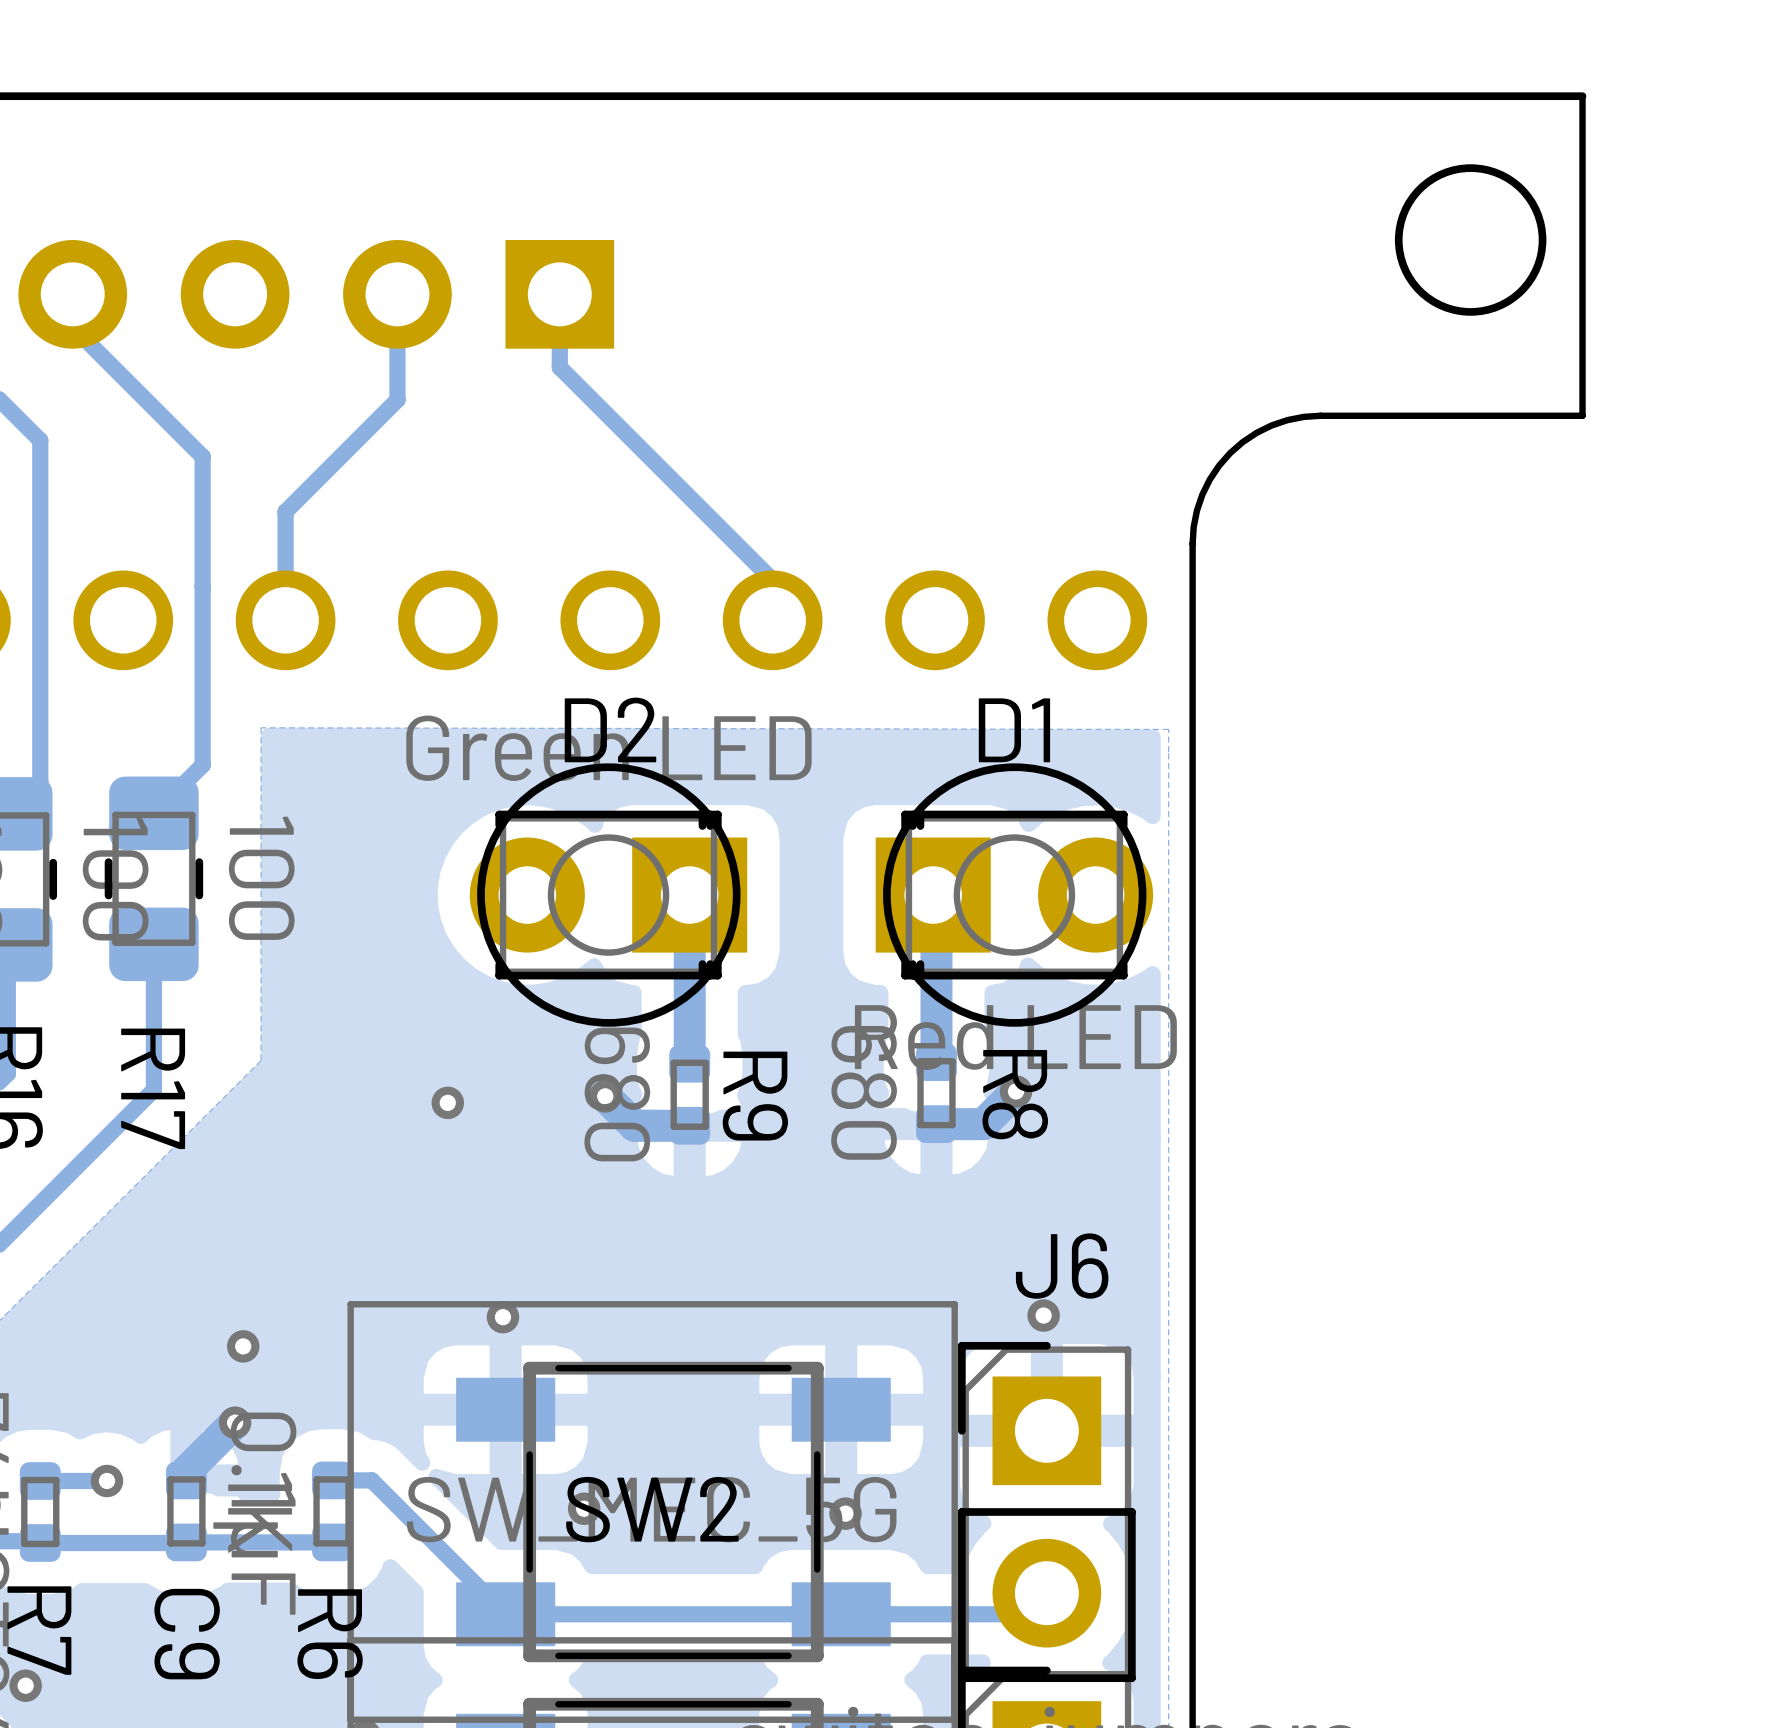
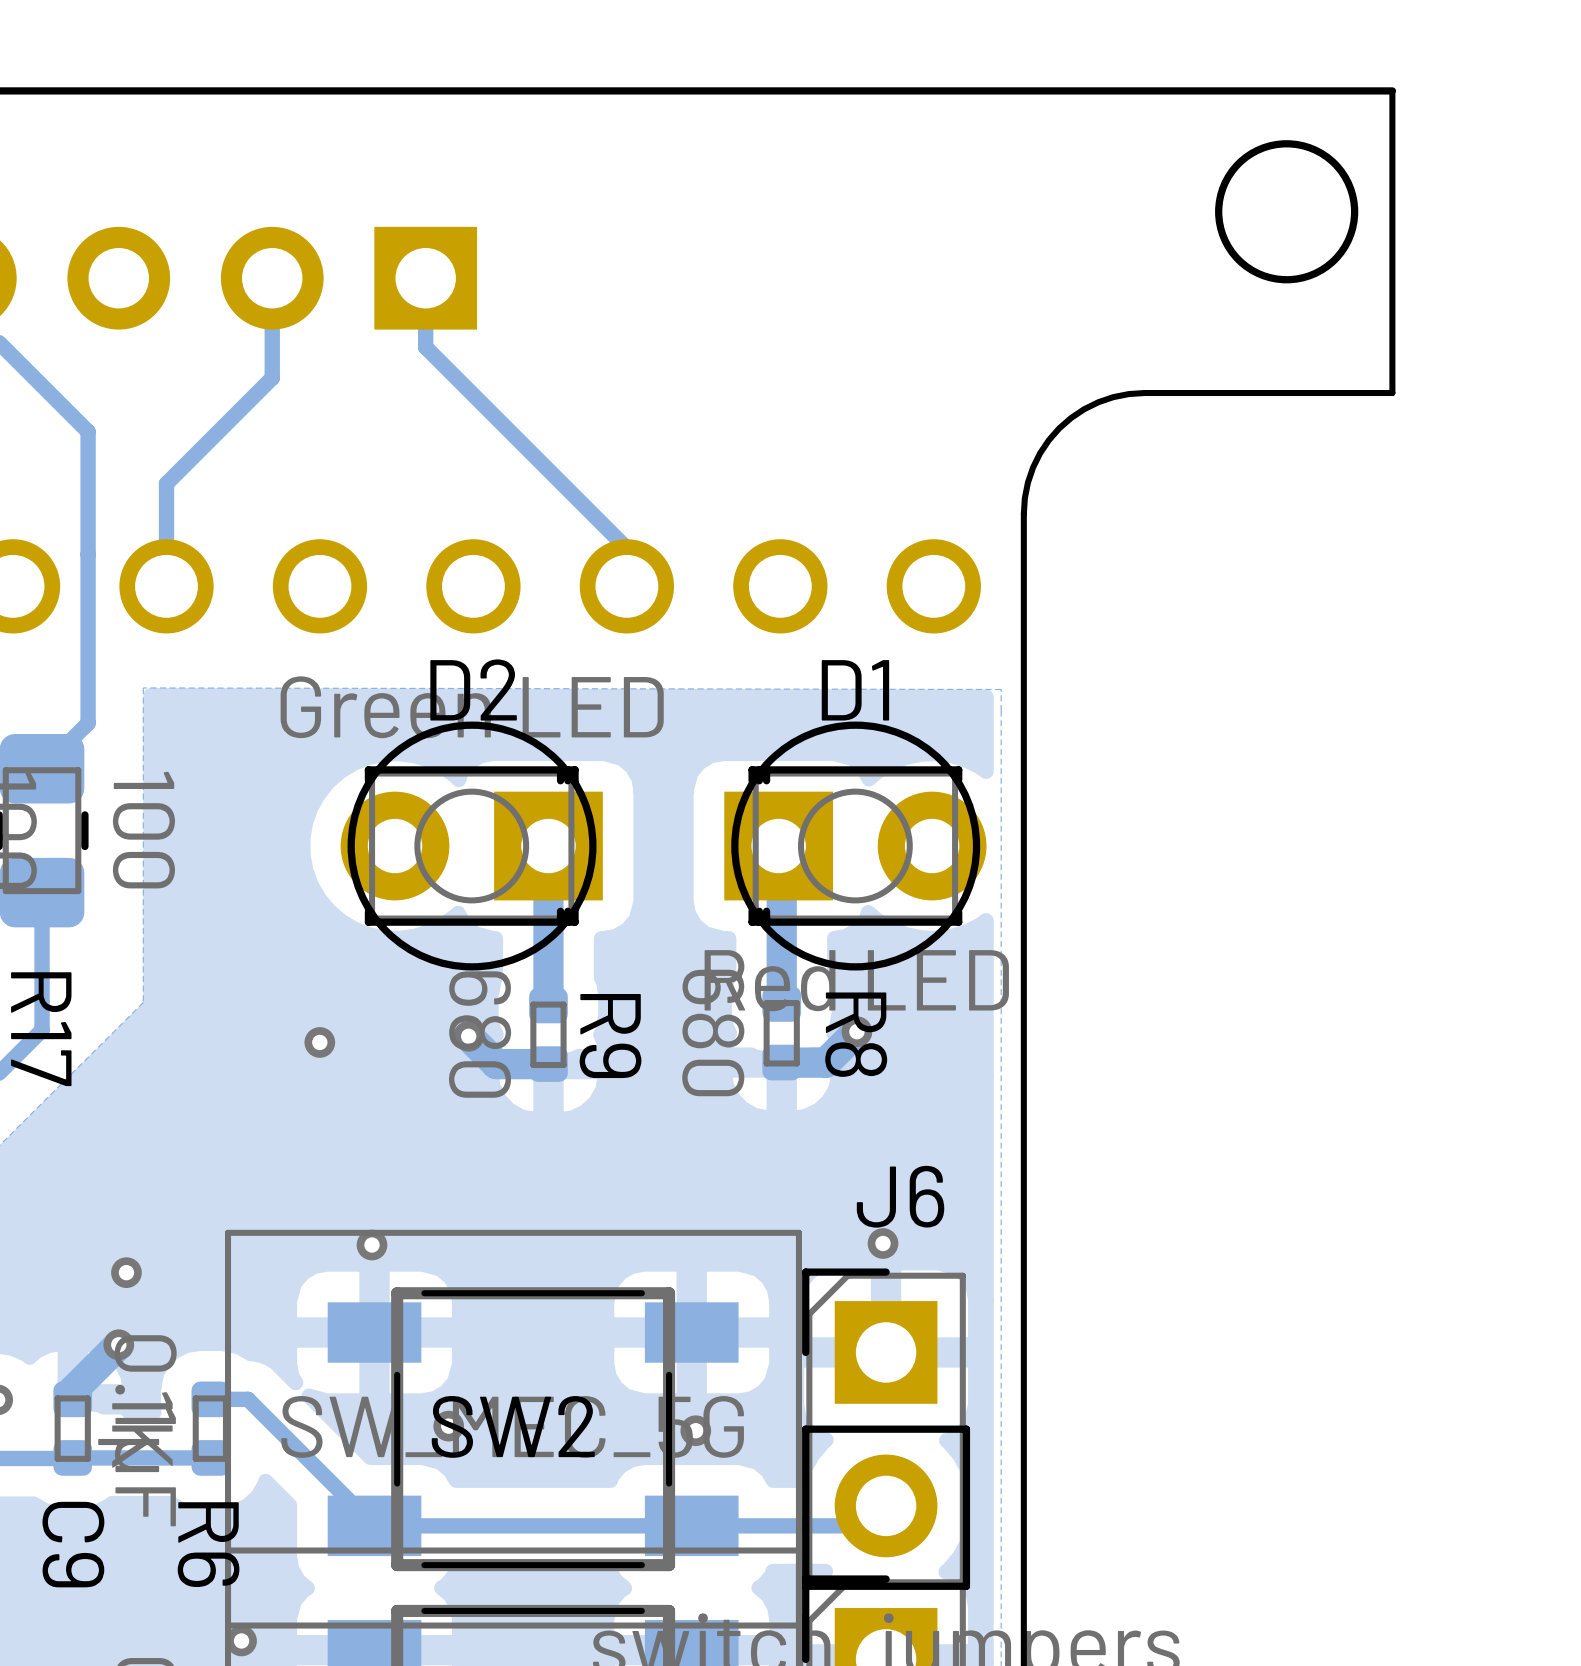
round board edge position: (1470, 240) -> (1286, 211)

